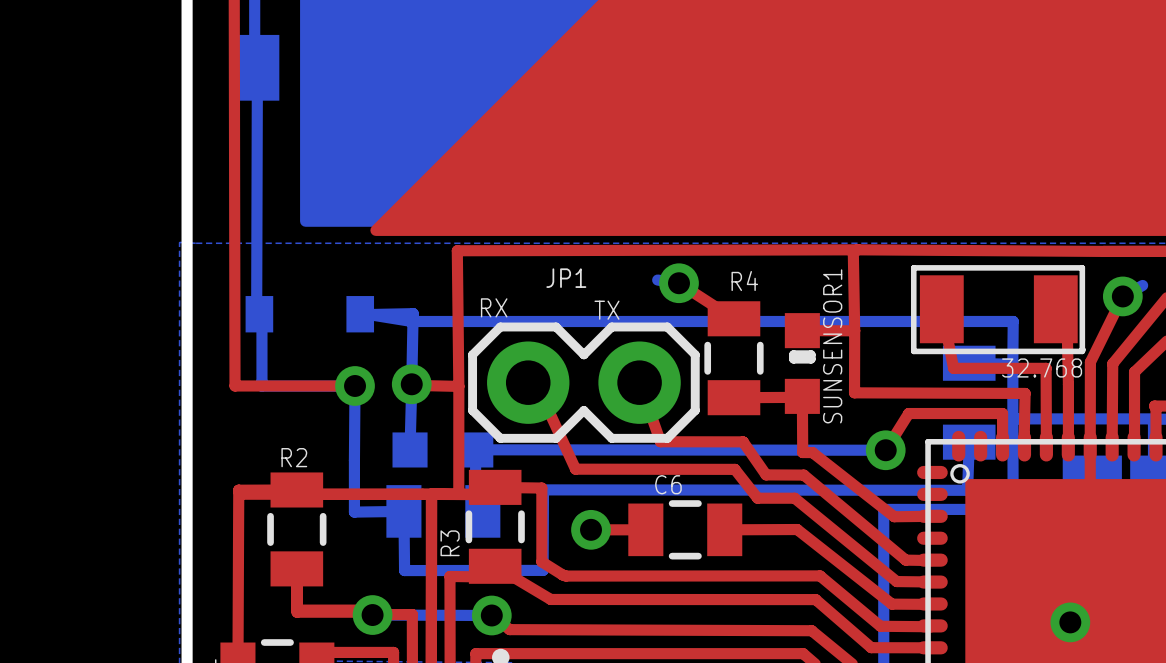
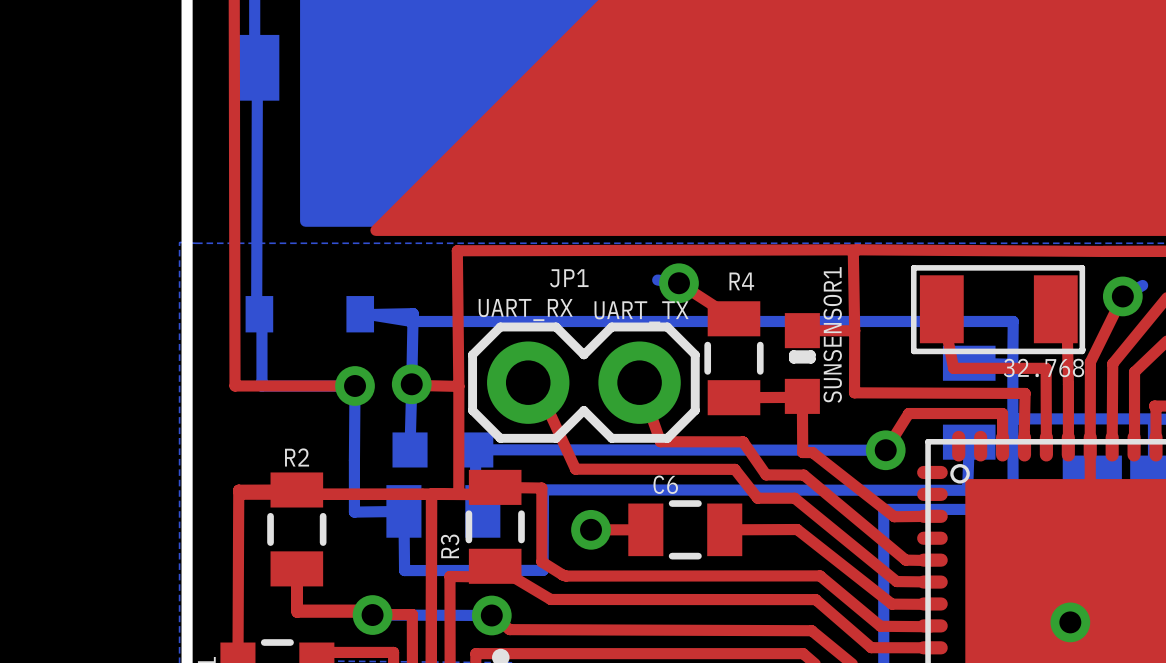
text: RX (494, 307) -> UART_RX (525, 310)
text: TX (606, 310) -> UART_TX (641, 312)

